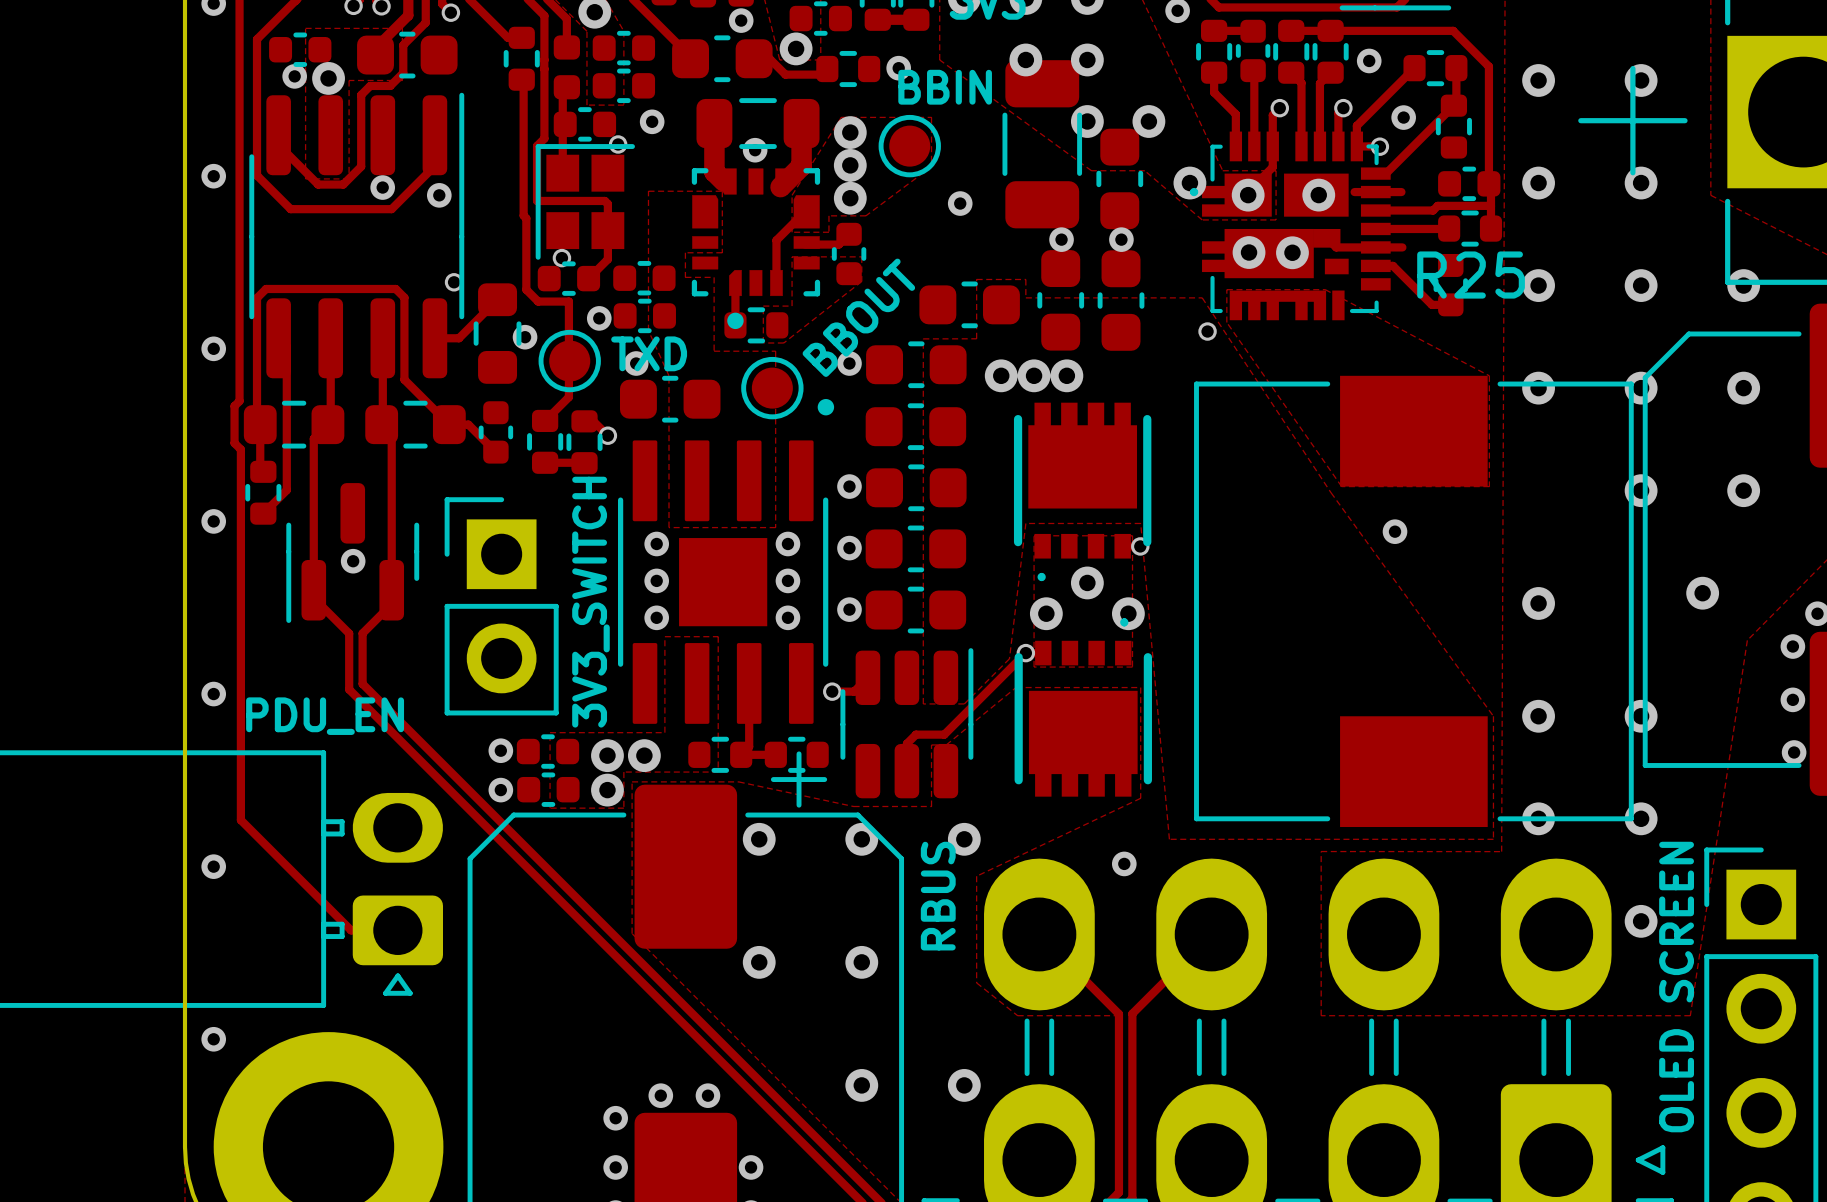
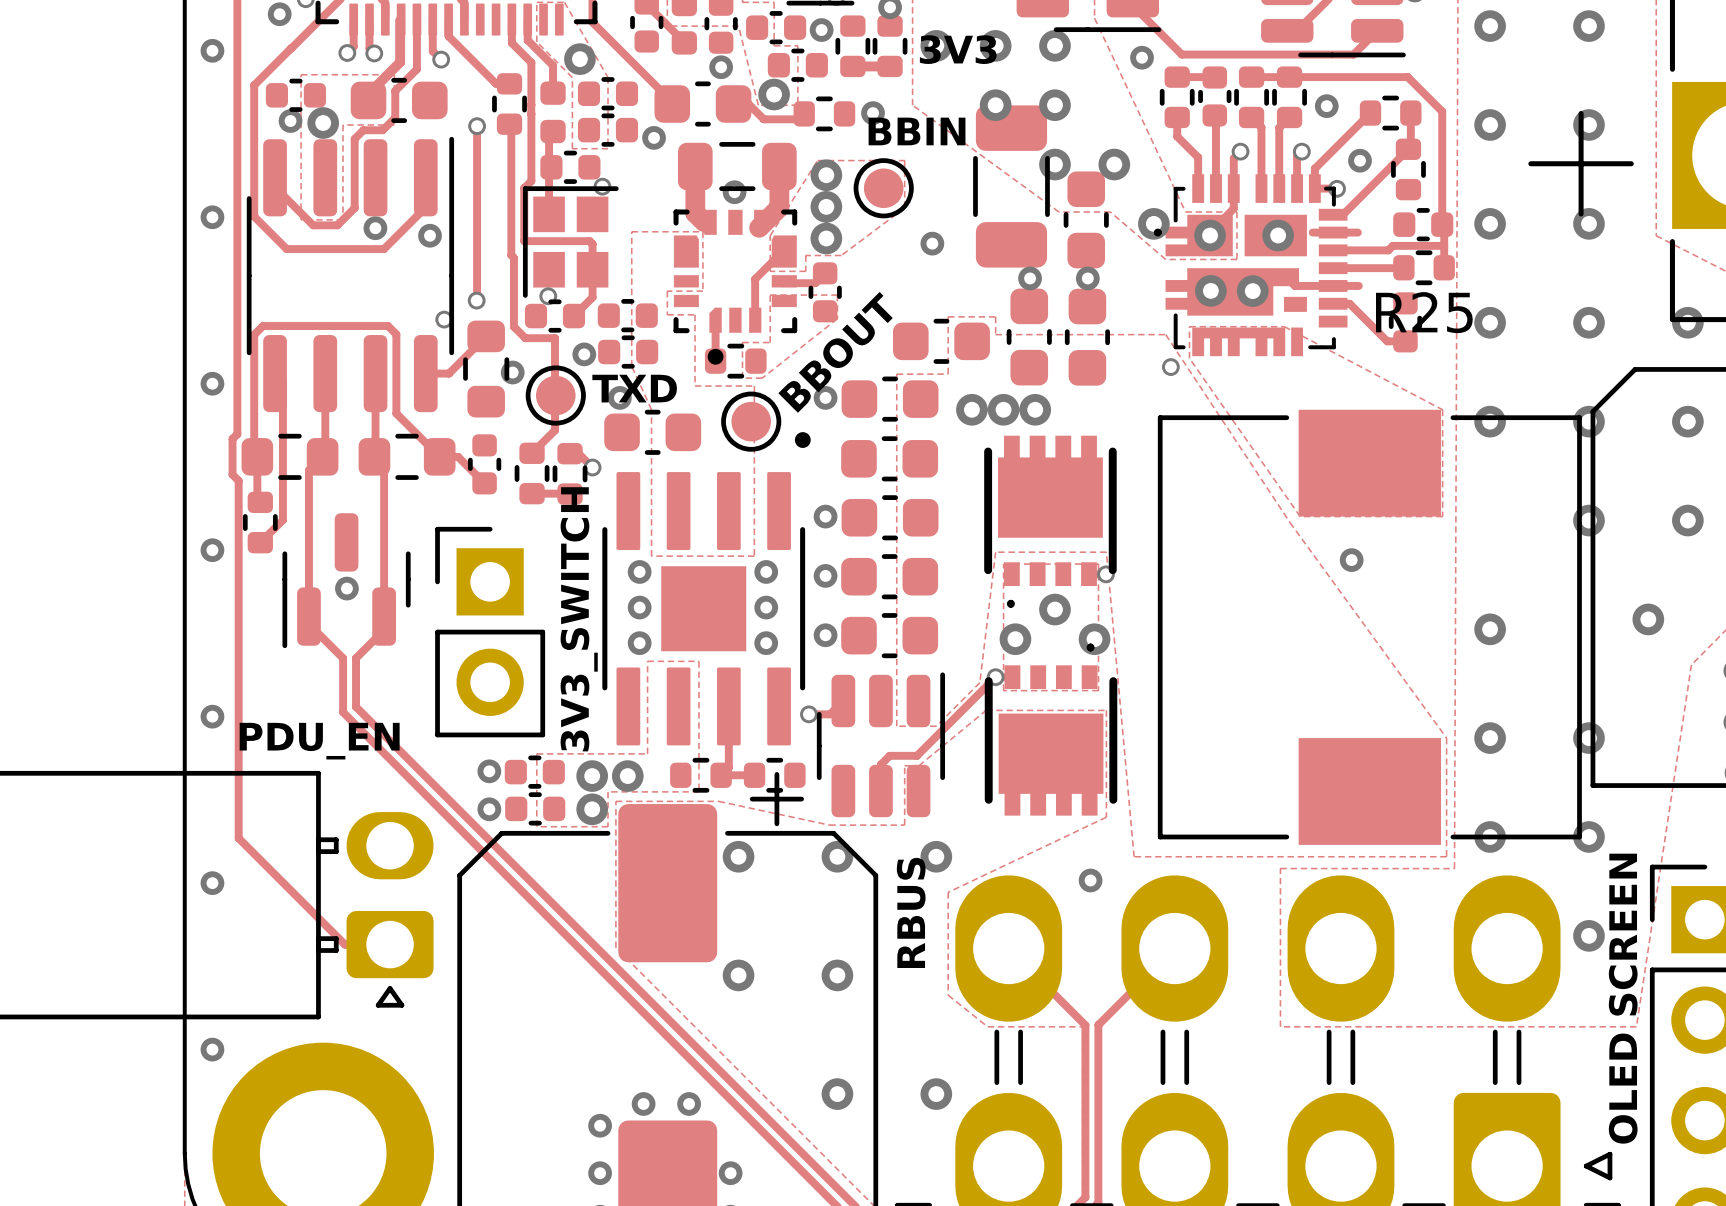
track: none -> (477, 126) (477, 300)
via: none -> (477, 126)
via position: (652, 121) -> (654, 137)
via: none -> (476, 300)

